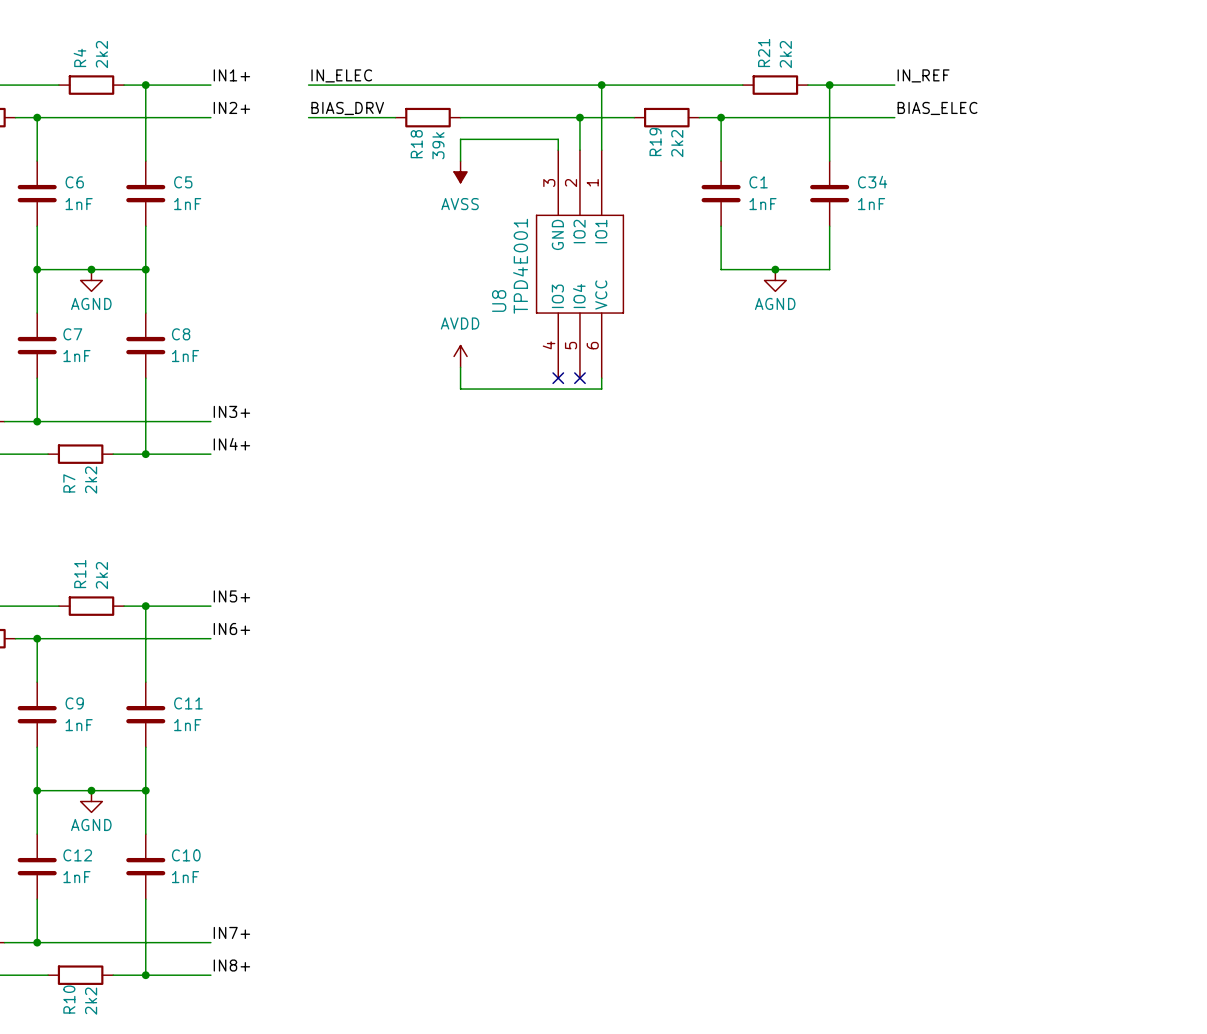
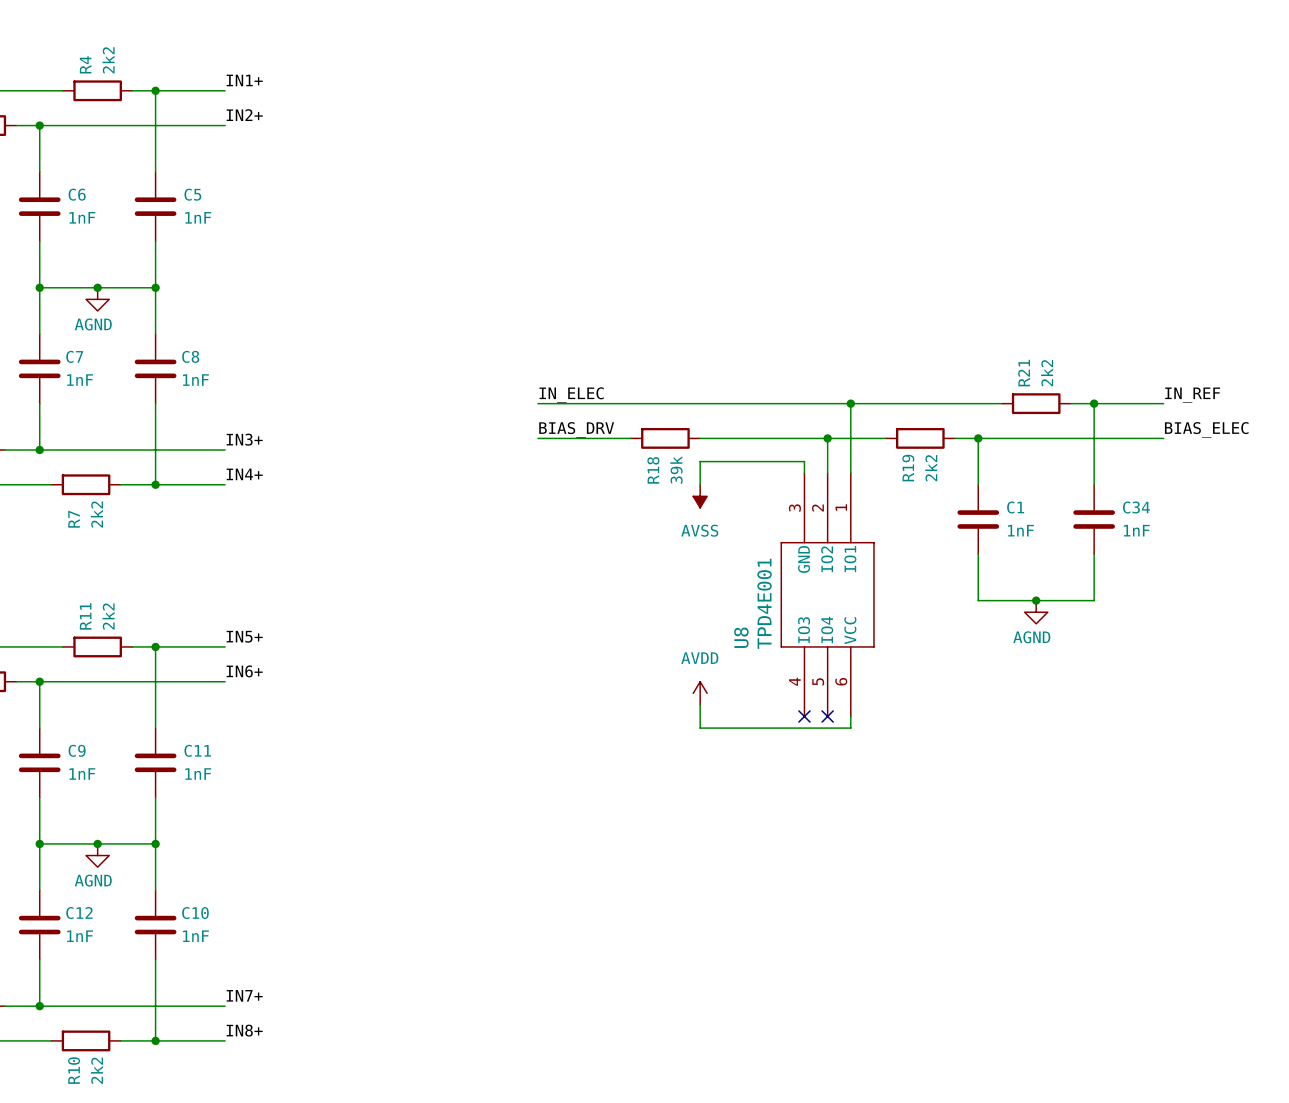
label: IN_ELEC (341, 75) -> none
label: IN_REF (923, 75) -> none
wire: (308, 85) (742, 85) -> none
wire: (601, 85) (601, 150) -> none
junction: (601, 85) -> none
R21 position: (775, 85) -> (1036, 403)
wire: (807, 85) (894, 85) -> none
wire: (829, 85) (829, 161) -> none
junction: (829, 85) -> none
label: BIAS_DRV (347, 108) -> none
label: BIAS_ELEC (937, 108) -> none
wire: (308, 117) (395, 117) -> none
R18 position: (428, 117) -> (665, 438)
wire: (460, 117) (634, 117) -> none
wire: (579, 117) (579, 150) -> none
junction: (579, 117) -> none
R19 position: (666, 117) -> (920, 438)
wire: (699, 117) (894, 117) -> none
wire: (721, 117) (721, 161) -> none
junction: (721, 117) -> none
wire: (558, 150) (558, 139) (460, 139) (460, 161) -> none
power symbol: AVSS (460, 171) -> none
C1 position: (721, 193) -> (978, 519)
C34 position: (829, 193) -> (1094, 519)
wire: (721, 226) (721, 269) (829, 269) (829, 226) -> none
U8 position: (579, 264) -> (827, 594)
junction: (775, 269) -> none
power symbol: AGND (775, 280) -> none
power symbol: AVDD (460, 356) -> none
wire: (460, 367) (460, 389) (601, 389) (601, 378) -> none
label: none -> IN_ELEC (571, 395)
label: none -> IN_REF (1192, 395)
wire: none -> (537, 403) (1001, 403)
no-connect mark: (558, 378) -> none
no-connect mark: (579, 378) -> none
wire: none -> (850, 403) (850, 473)
junction: none -> (850, 403)
wire: none -> (1070, 403) (1163, 403)
wire: none -> (1094, 403) (1094, 484)
junction: none -> (1094, 403)
label: none -> BIAS_DRV (576, 429)
label: none -> BIAS_ELEC (1206, 429)
wire: none -> (537, 438) (630, 438)
wire: none -> (700, 438) (885, 438)
wire: none -> (827, 438) (827, 473)
junction: none -> (827, 438)
wire: none -> (955, 438) (1163, 438)
wire: none -> (978, 438) (978, 484)
junction: none -> (978, 438)
wire: none -> (804, 473) (804, 461) (700, 461) (700, 484)
power symbol: none -> AVSS (700, 496)
wire: none -> (978, 554) (978, 600) (1094, 600) (1094, 554)
junction: none -> (1036, 600)
power symbol: none -> AGND (1036, 612)
power symbol: none -> AVDD (700, 693)
wire: none -> (700, 704) (700, 728) (850, 728) (850, 716)
no-connect mark: none -> (804, 716)
no-connect mark: none -> (827, 716)

